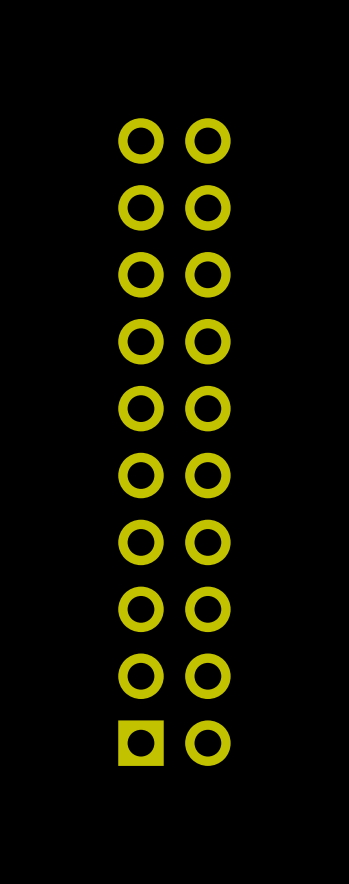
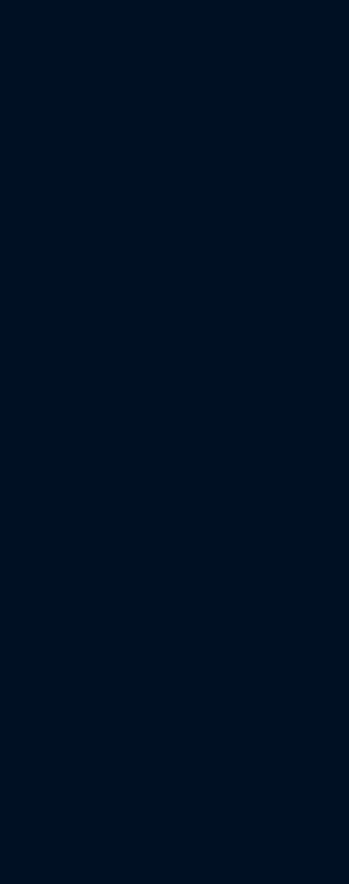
part: (174, 442) -> none

